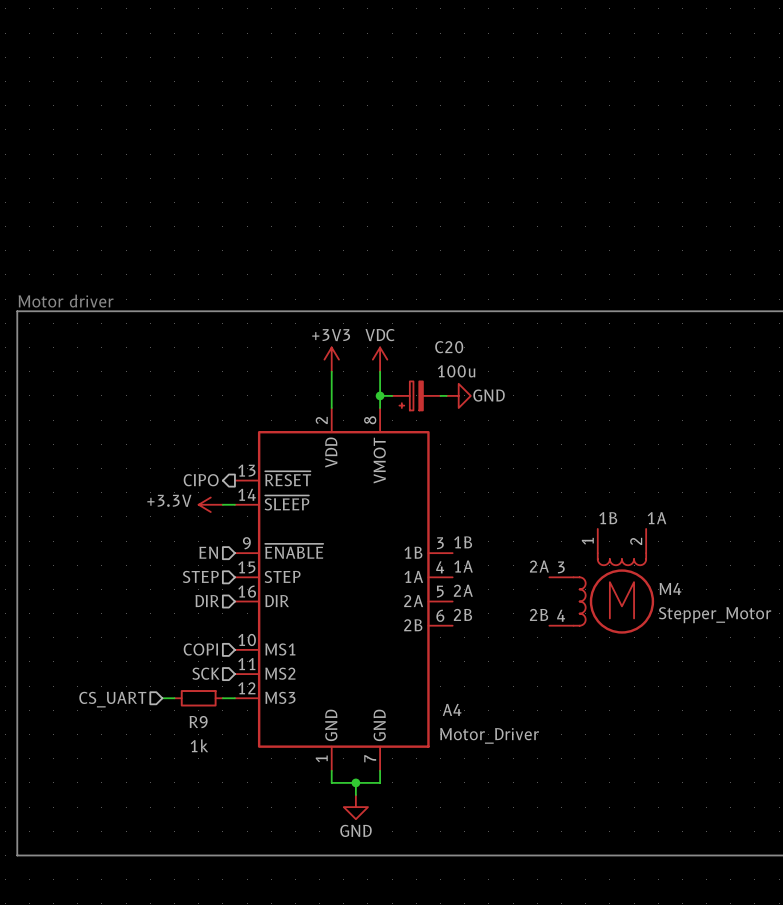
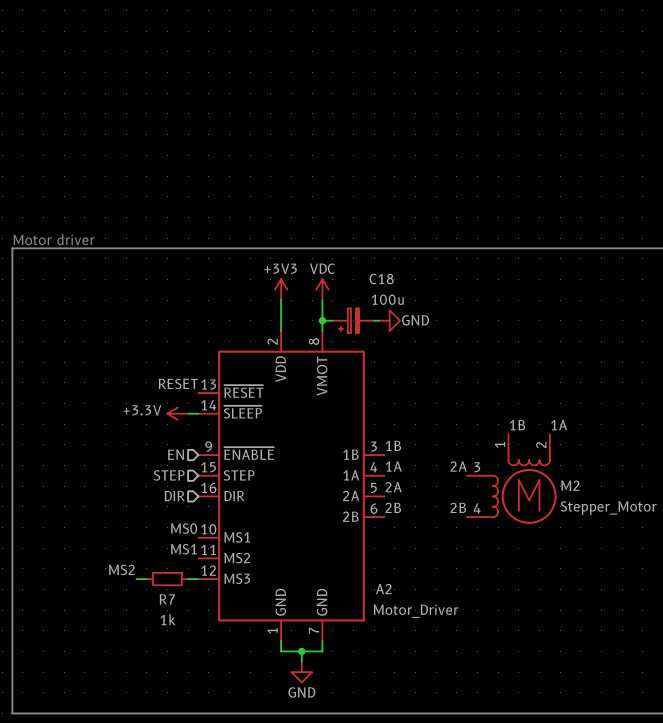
C20 name: C20 (449, 347) -> C18 (381, 279)
label: none -> RESET (178, 383)
hierarchical label: CIPO (201, 480) -> none
M4 name: M4 (670, 588) -> M2 (570, 485)
label: none -> MS0 (184, 528)
hierarchical label: COPI (200, 649) -> none
label: none -> MS1 (183, 549)
hierarchical label: SCK (205, 673) -> none
label: none -> MS2 (121, 569)
hierarchical label: CS_UART (112, 699) -> none
A4 name: A4 (452, 709) -> A2 (383, 589)
R9 name: R9 (198, 722) -> R7 (167, 599)

